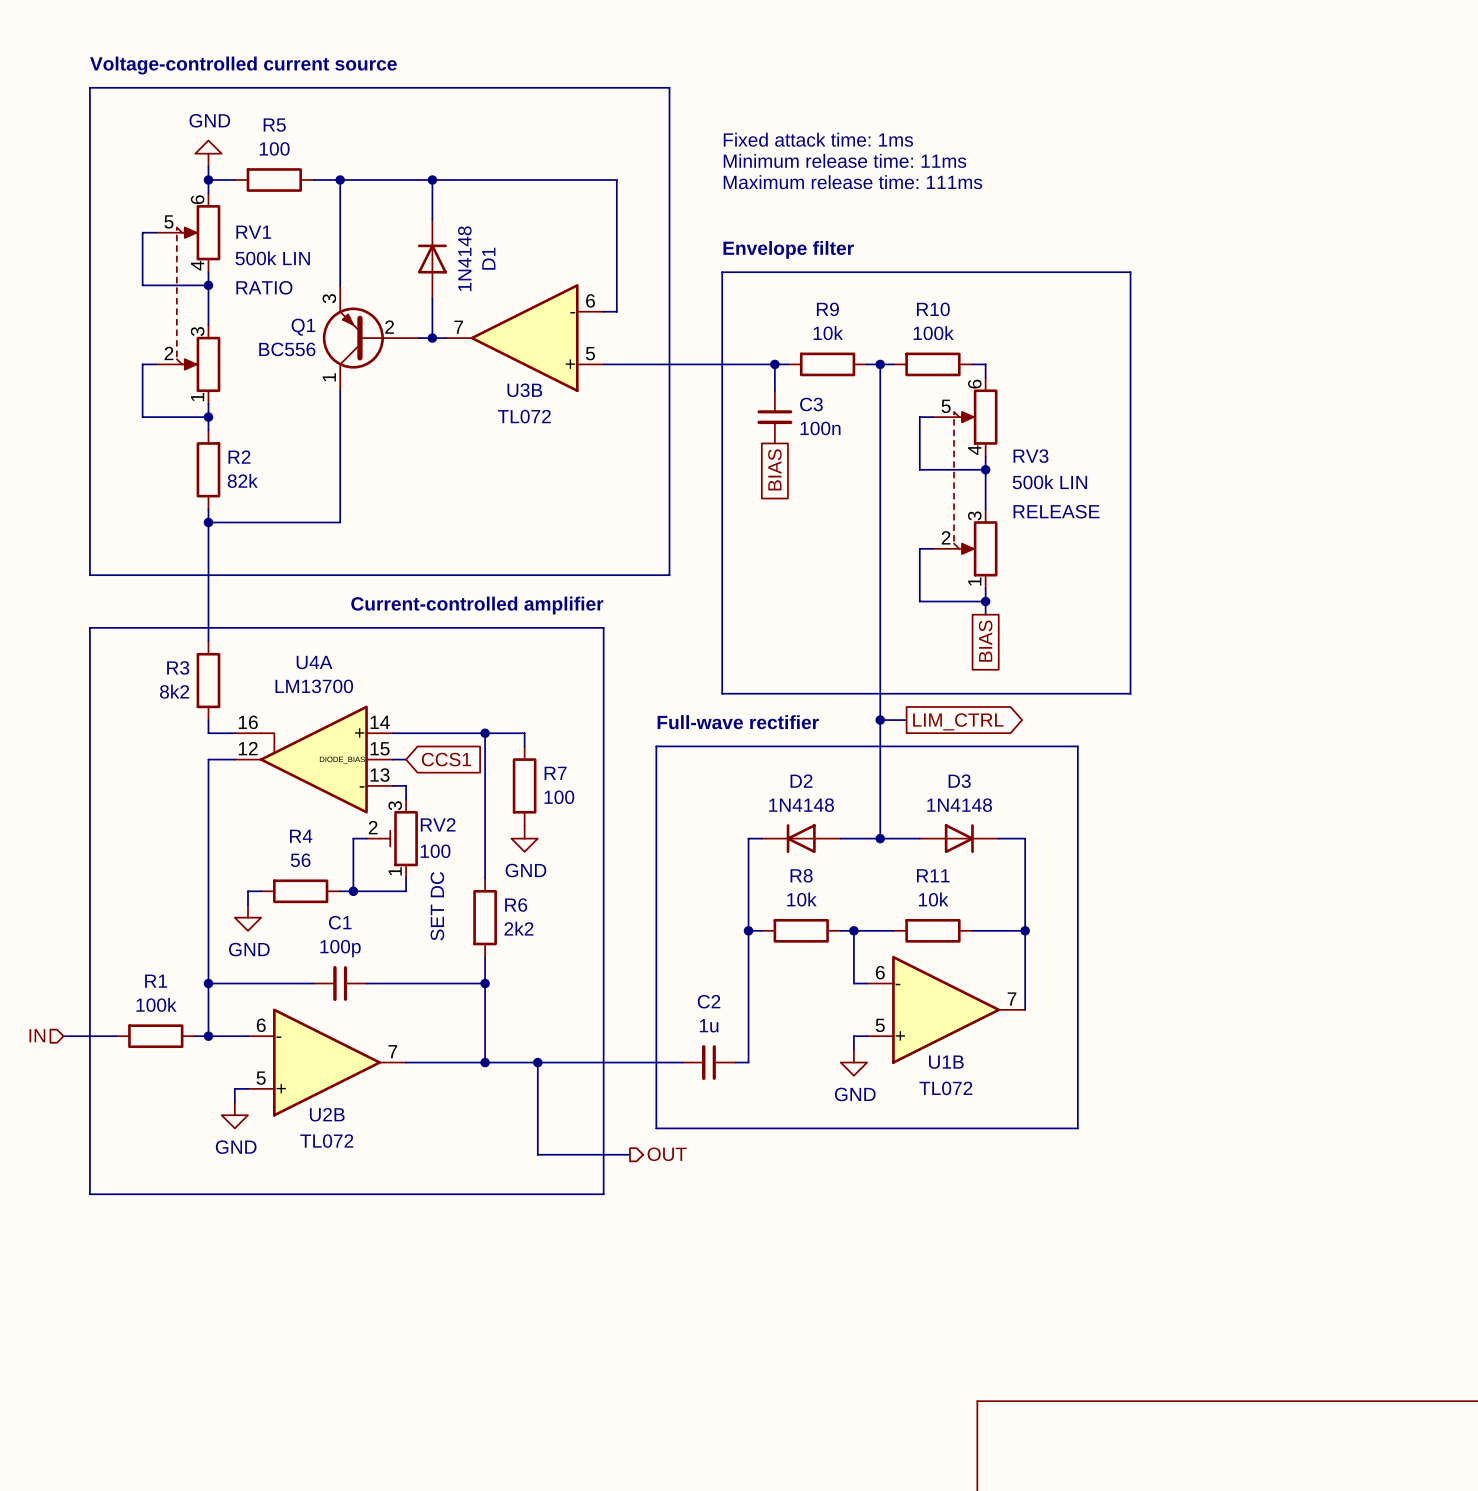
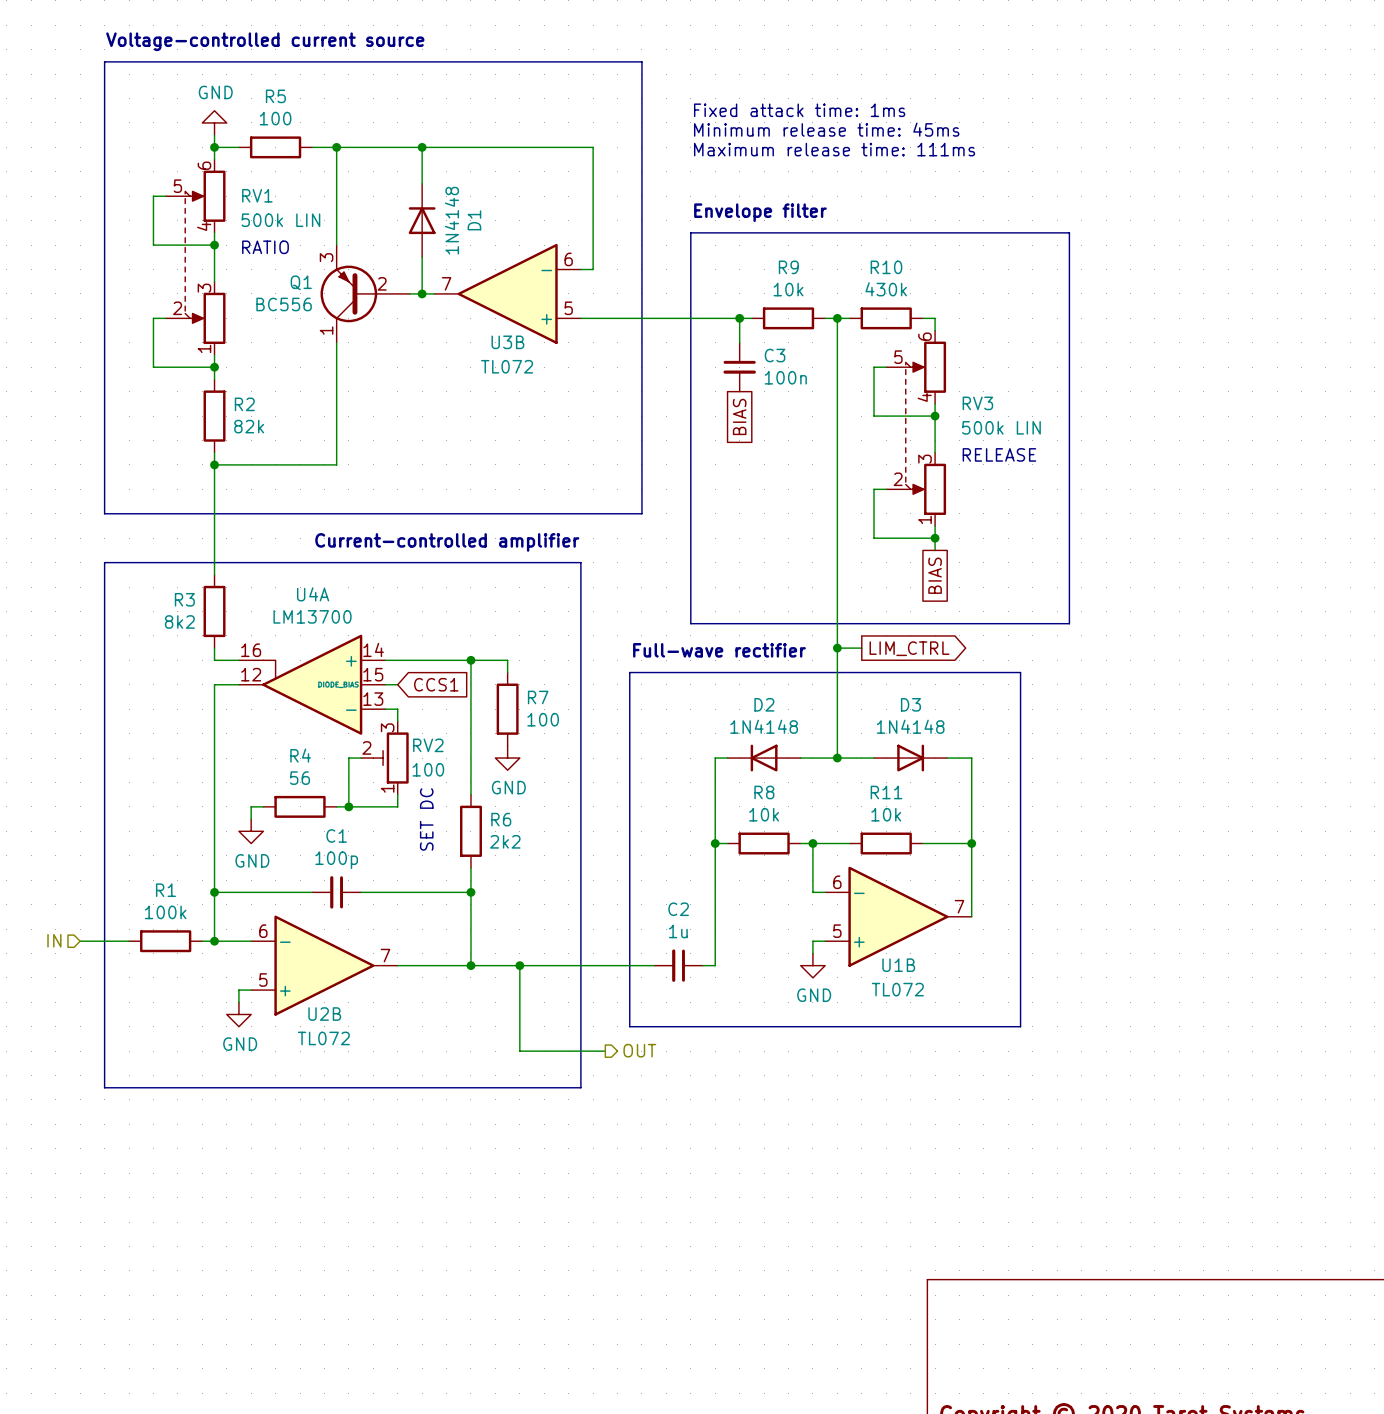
text: Minimum release time: 11ms (844, 160) -> Minimum release time: 45ms (826, 129)
R10 value: 100k (933, 333) -> 430k (886, 289)

